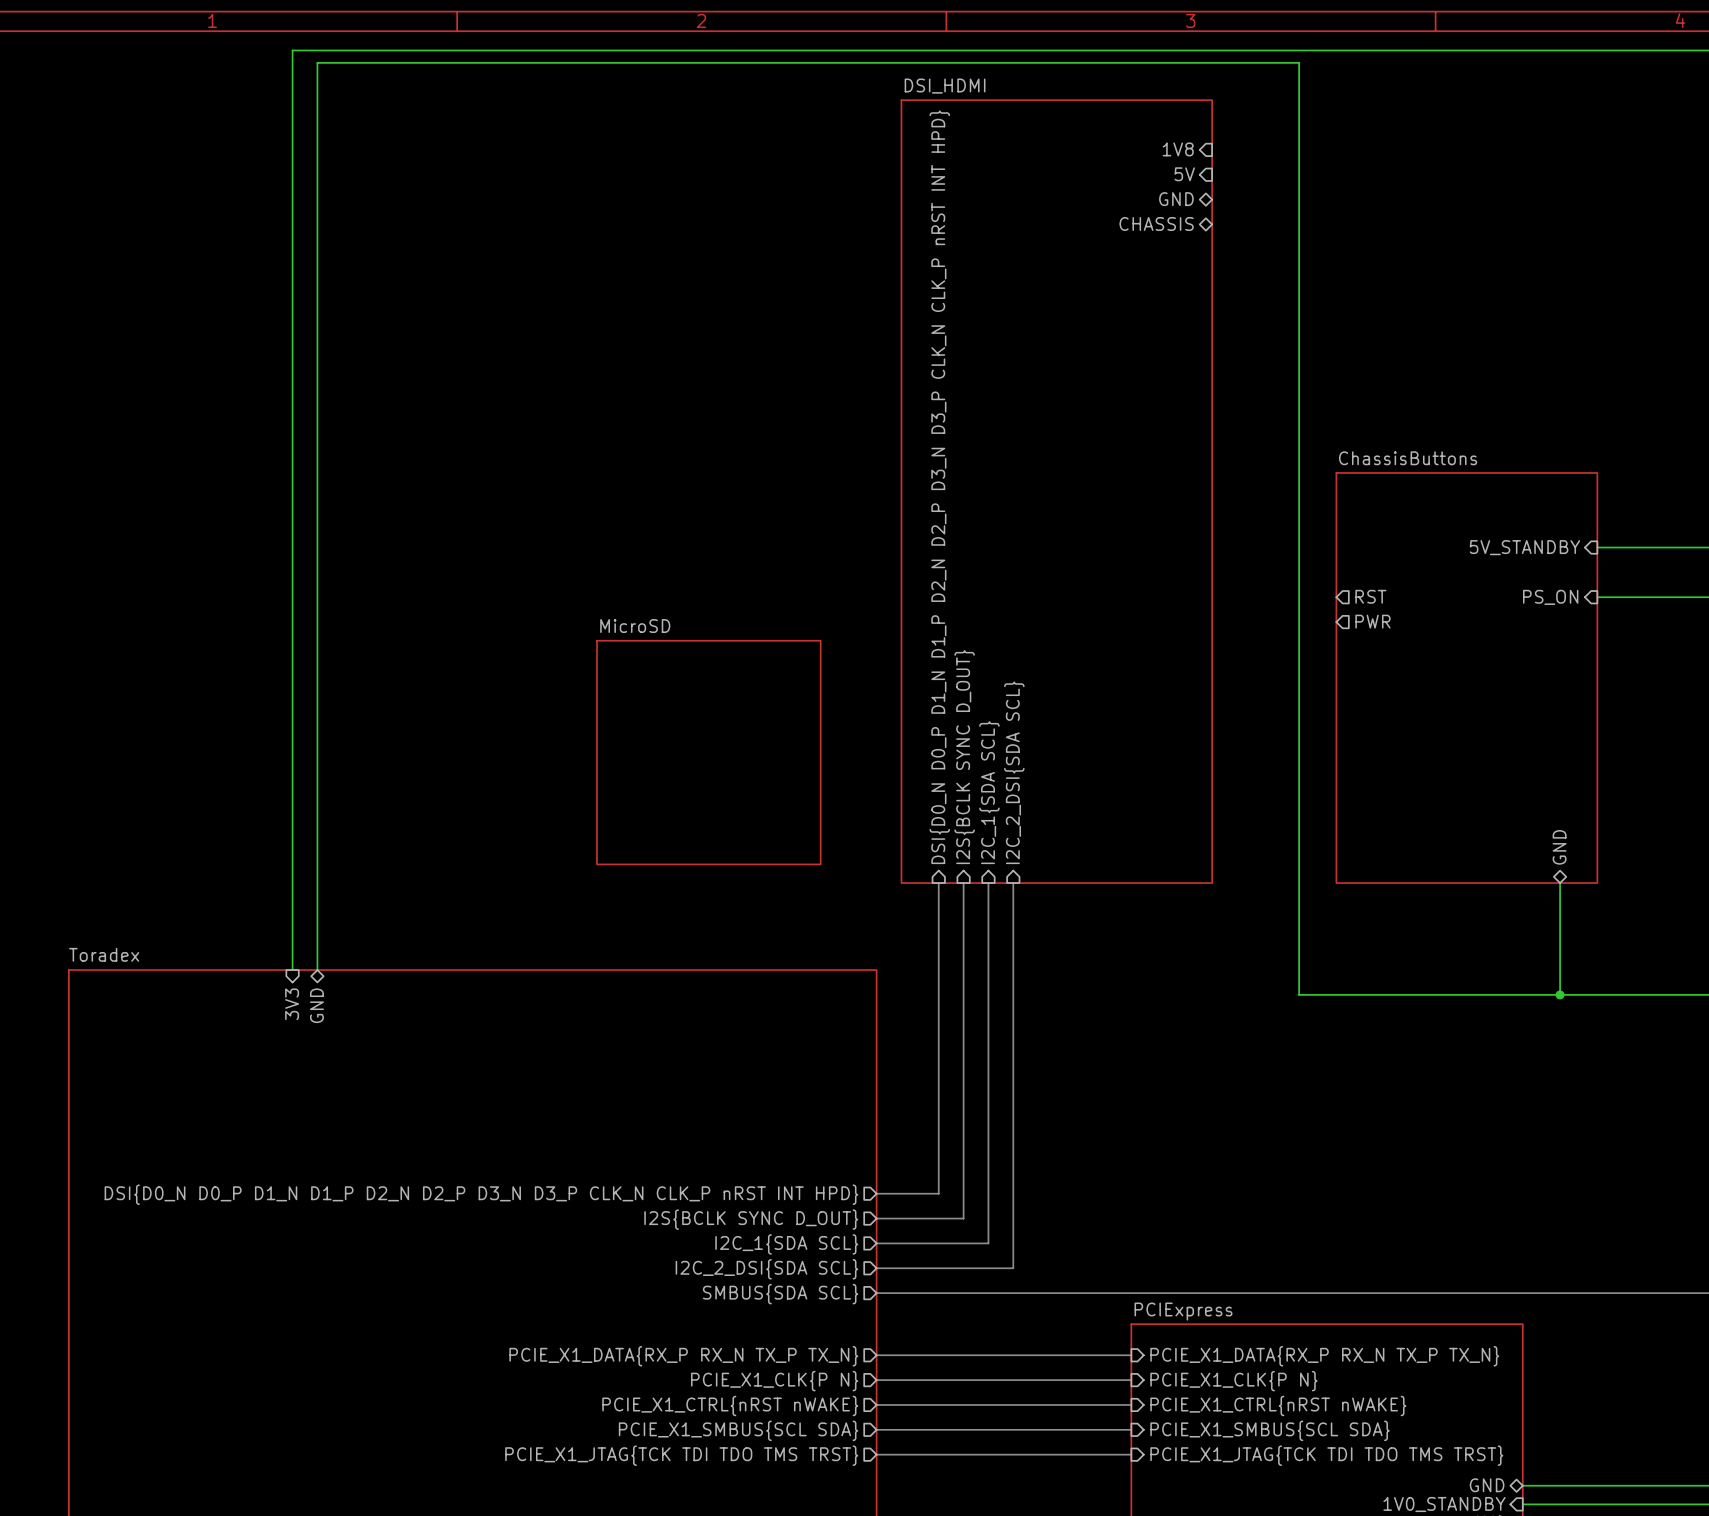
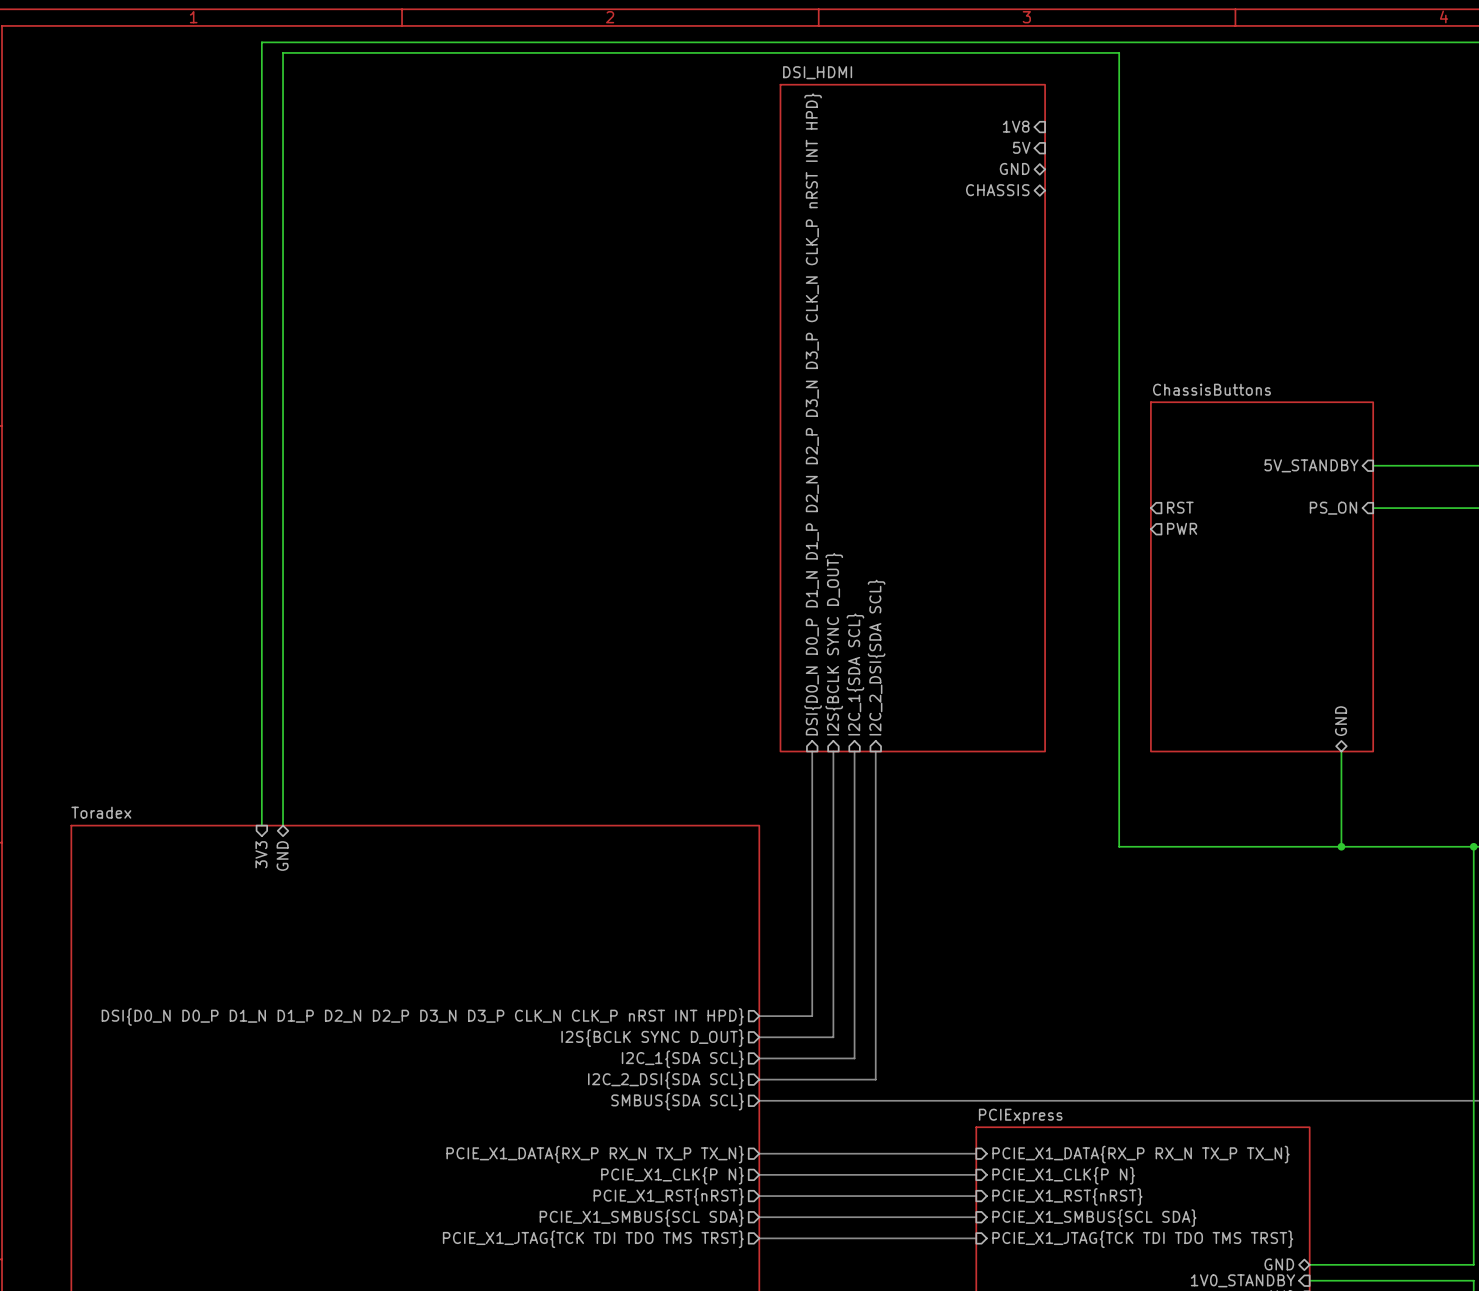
sheet MicroSD: (708, 752) -> none
sheet pin: PCIE_X1_CTRL{nRST nWAKE} (730, 1405) -> PCIE_X1_RST{nRST} (668, 1196)
sheet pin: PCIE_X1_CTRL{nRST nWAKE} (1278, 1405) -> PCIE_X1_RST{nRST} (1067, 1196)

